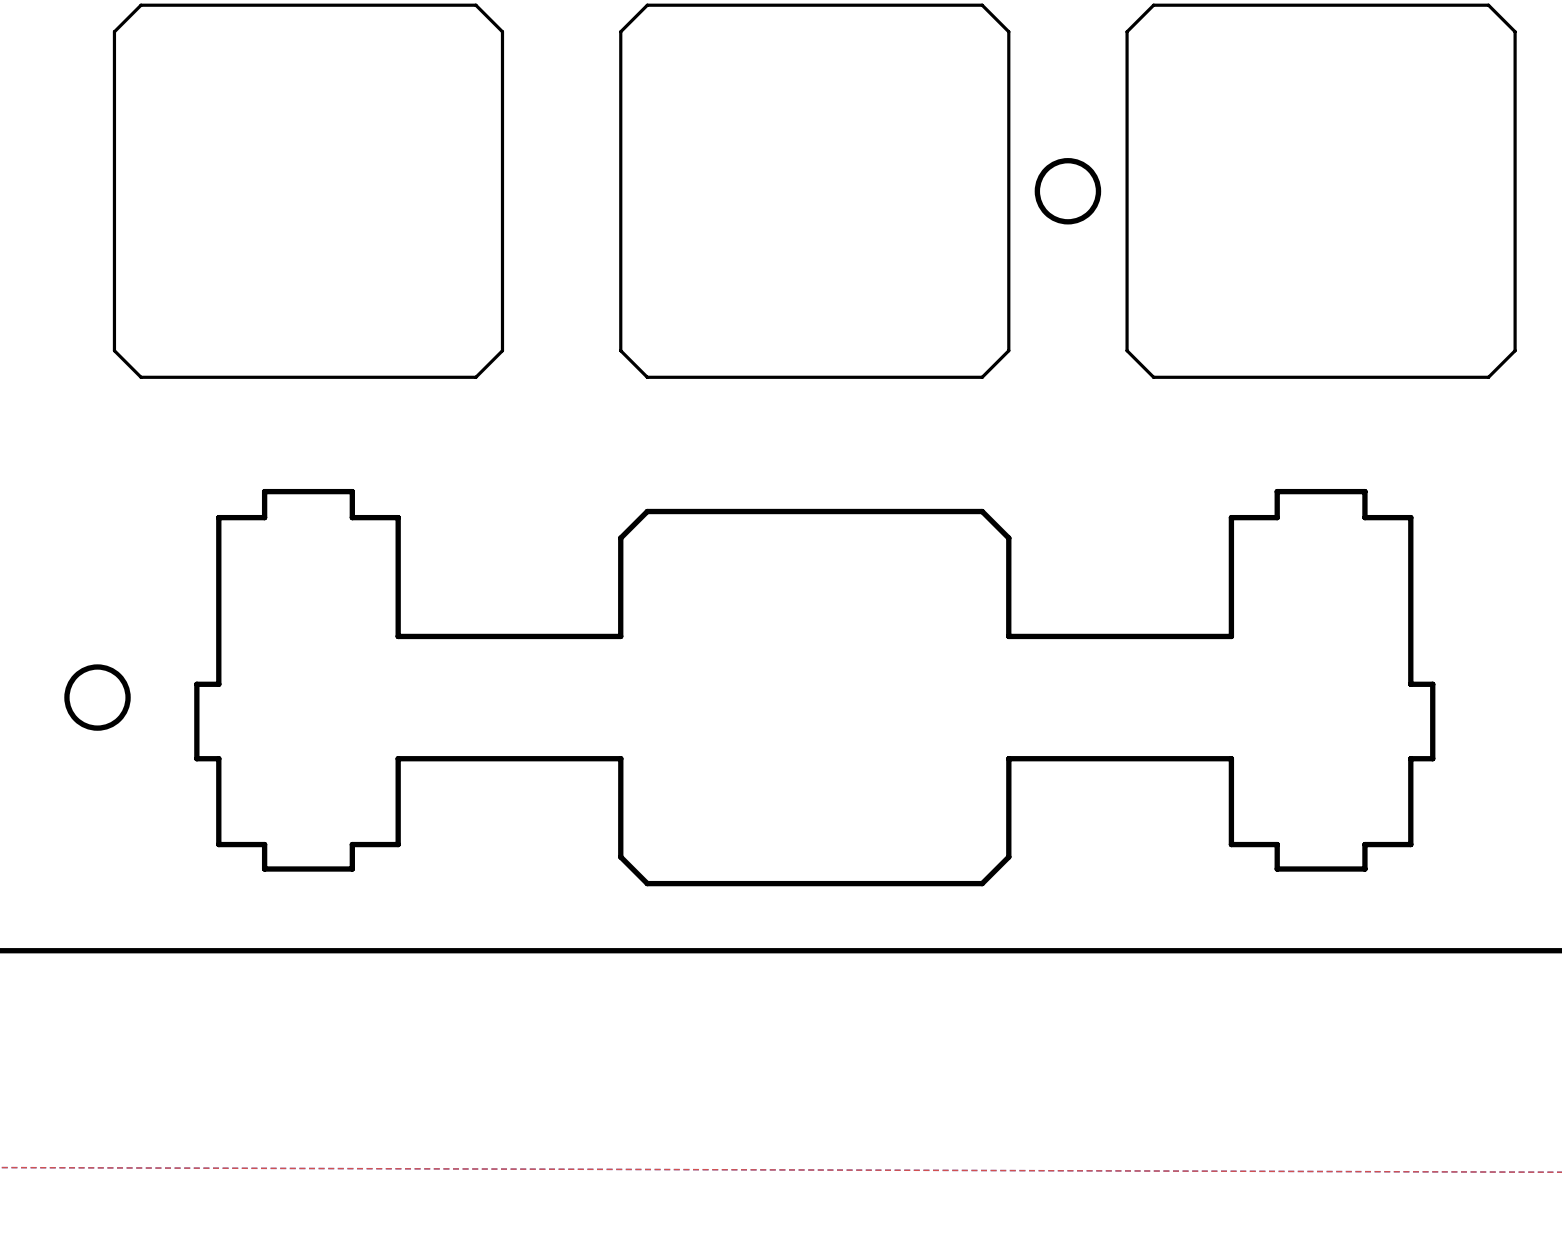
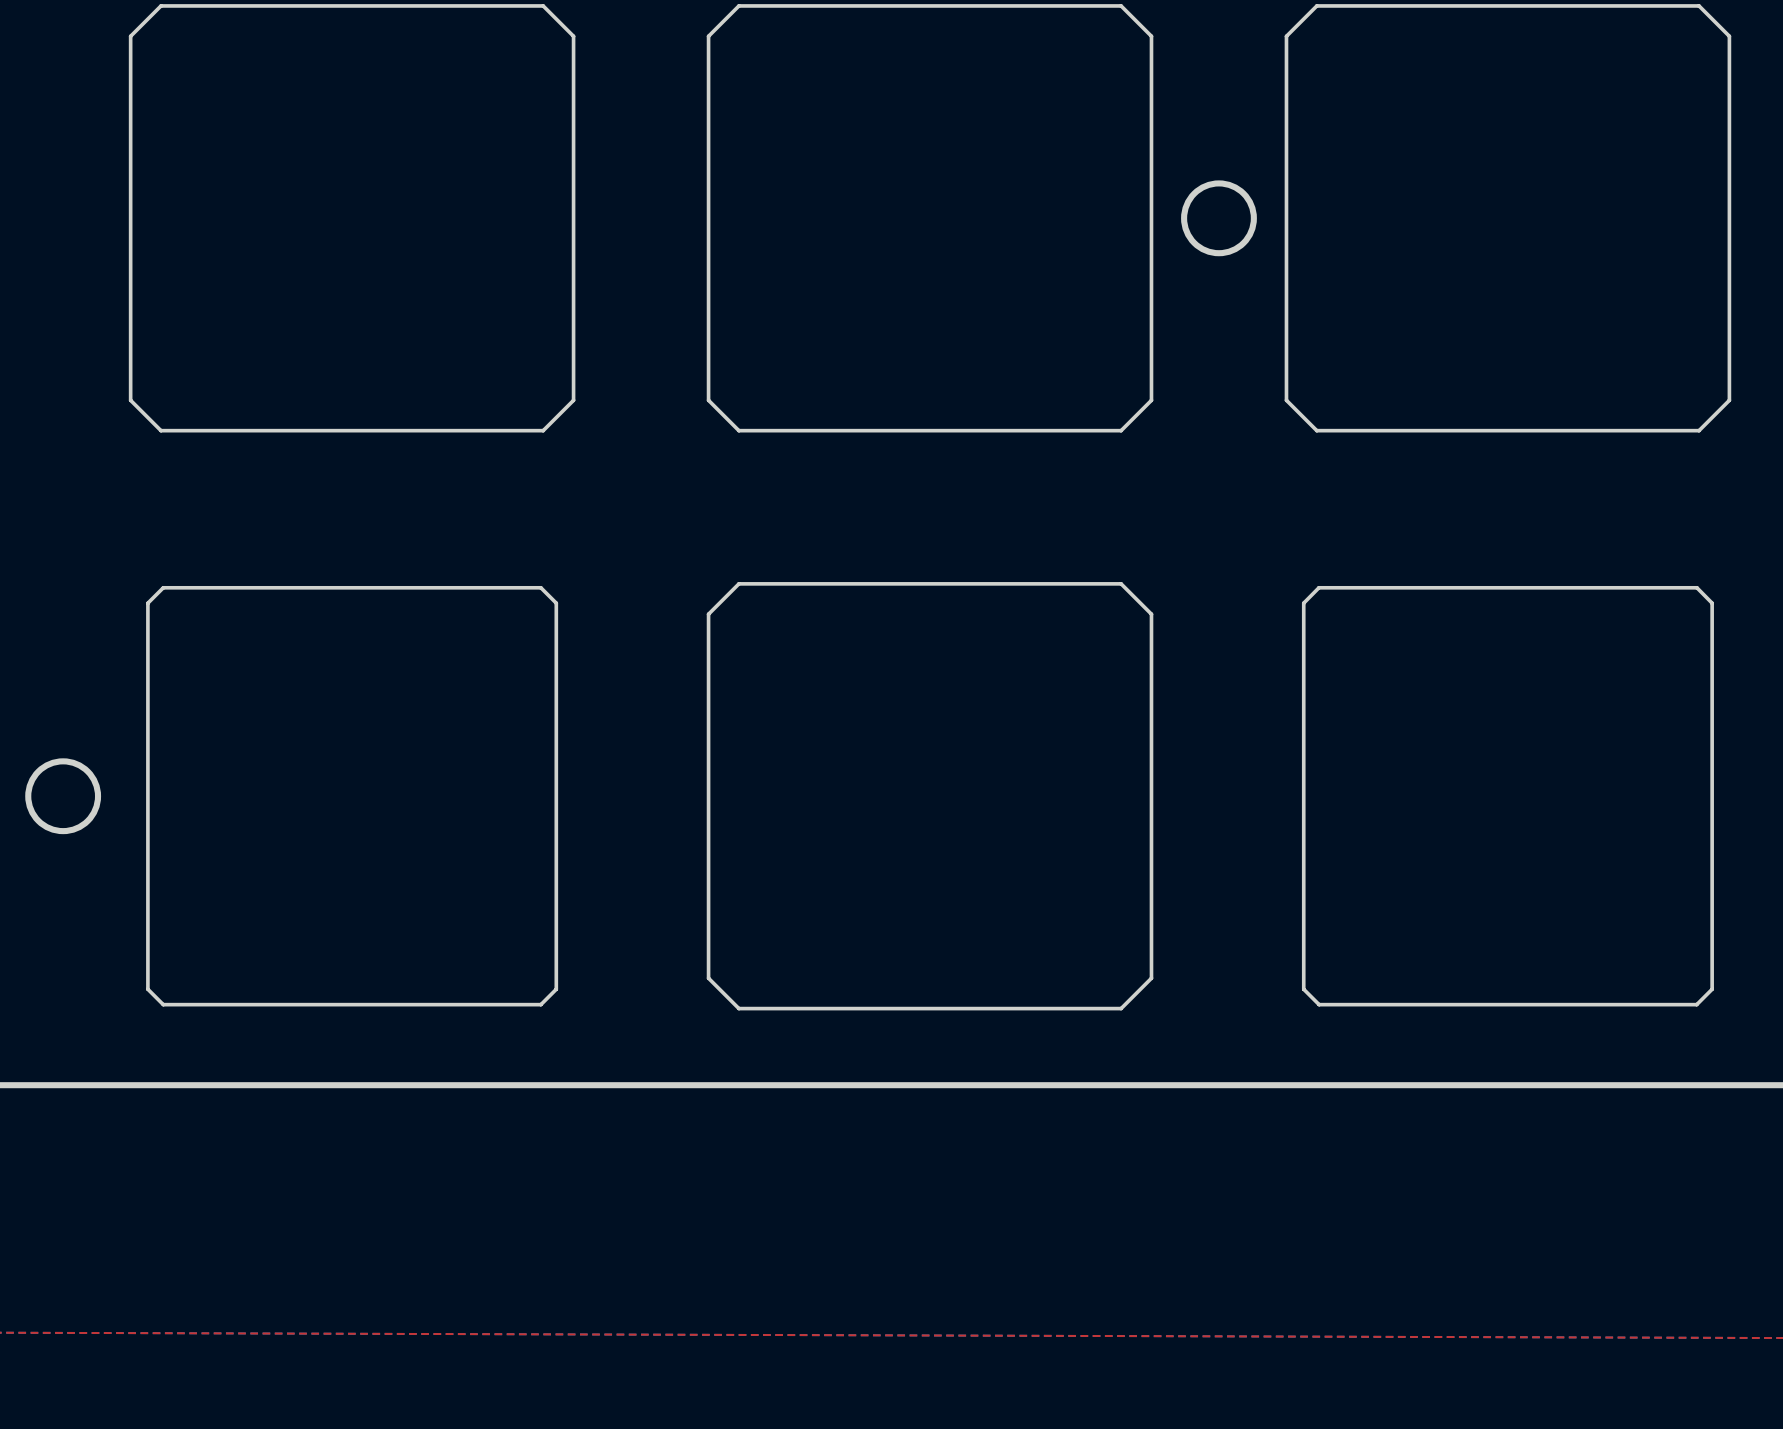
board edge: (264, 491) (264, 517) (218, 517) (218, 684) (196, 684) (196, 758) (218, 758) (218, 844) (264, 844) (264, 869) (352, 869) (352, 844) (398, 844) (398, 758) (620, 758) (620, 857) (647, 883) (982, 883) (1008, 857) (1008, 758) (1231, 758) (1231, 844) (1277, 844) (1277, 869) (1364, 869) (1364, 844) (1410, 844) (1410, 758) (1432, 758) (1432, 684) (1410, 684) (1410, 517) (1364, 517) (1364, 491) (1277, 491) (1277, 517) (1231, 517) (1231, 636) (1008, 636) (1008, 538) (982, 511) (647, 511) (620, 538) (620, 636) (398, 636) (398, 517) (352, 517) (352, 491) (264, 491) -> none
drawing: none -> [146, 582, 1714, 1011]
round board edge position: (97, 697) -> (63, 796)

